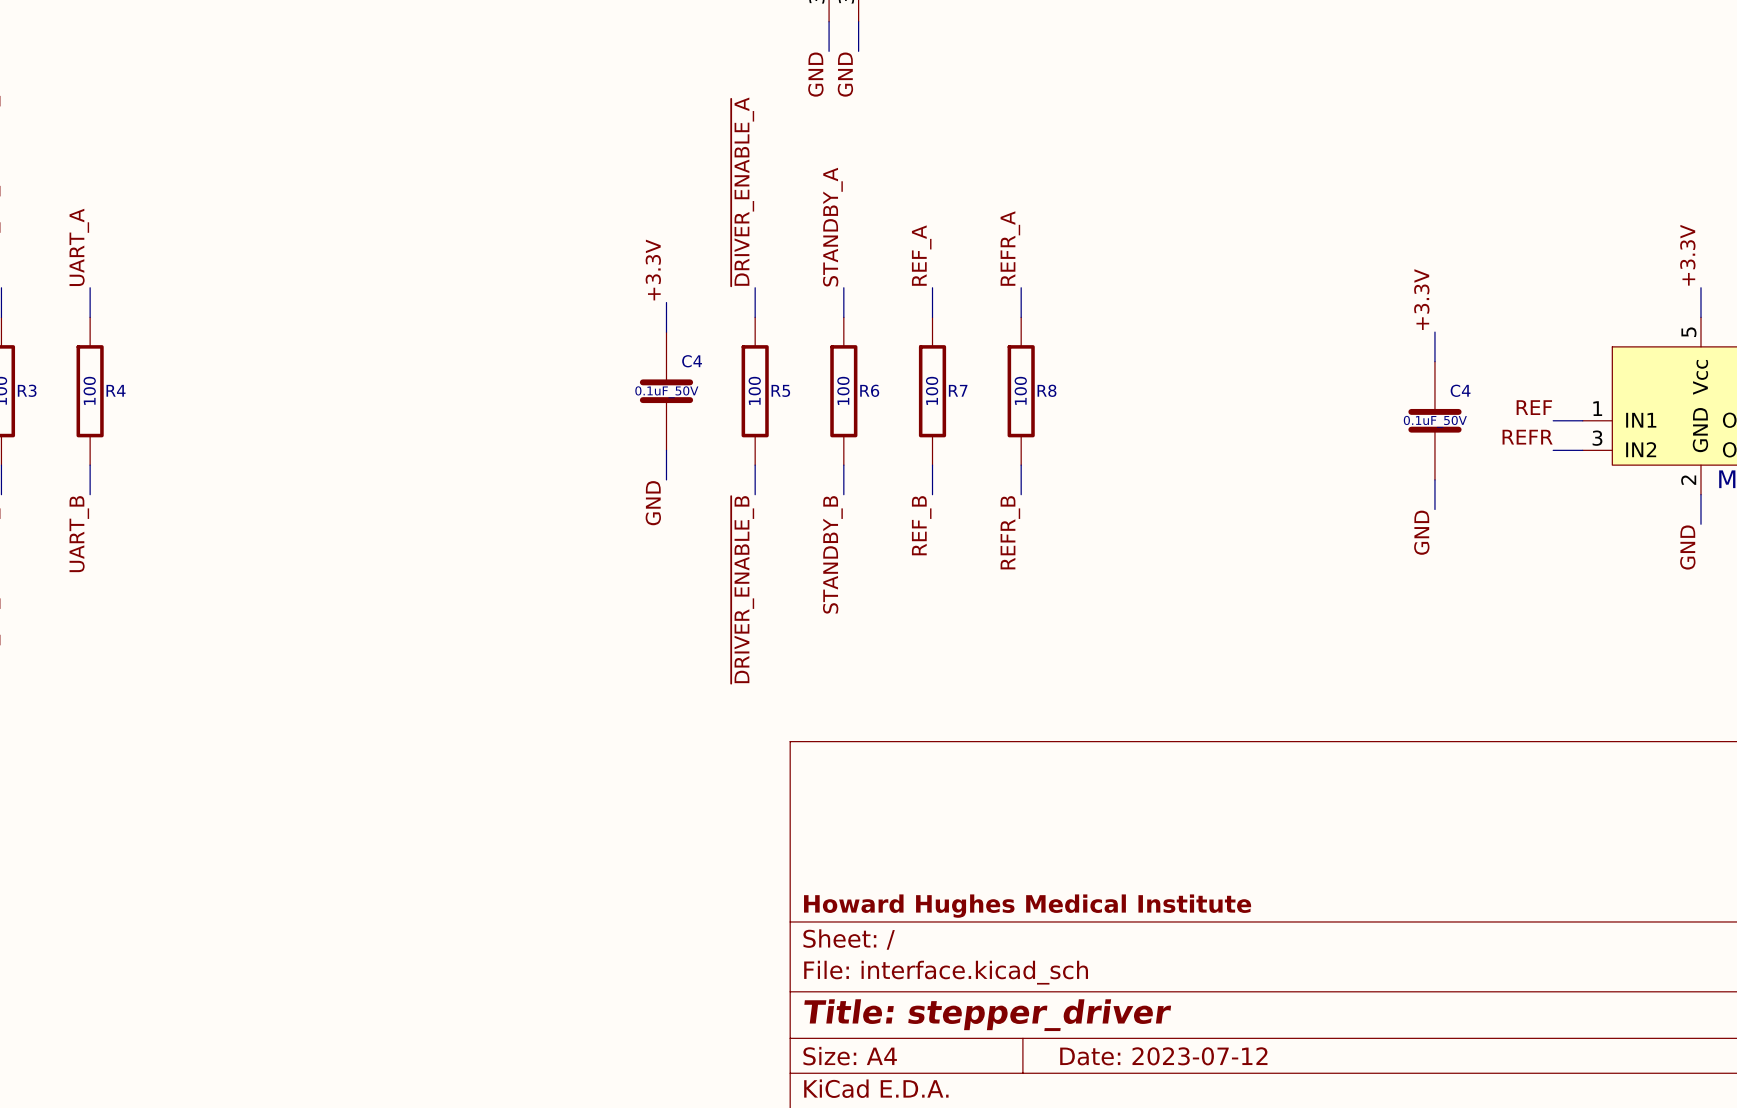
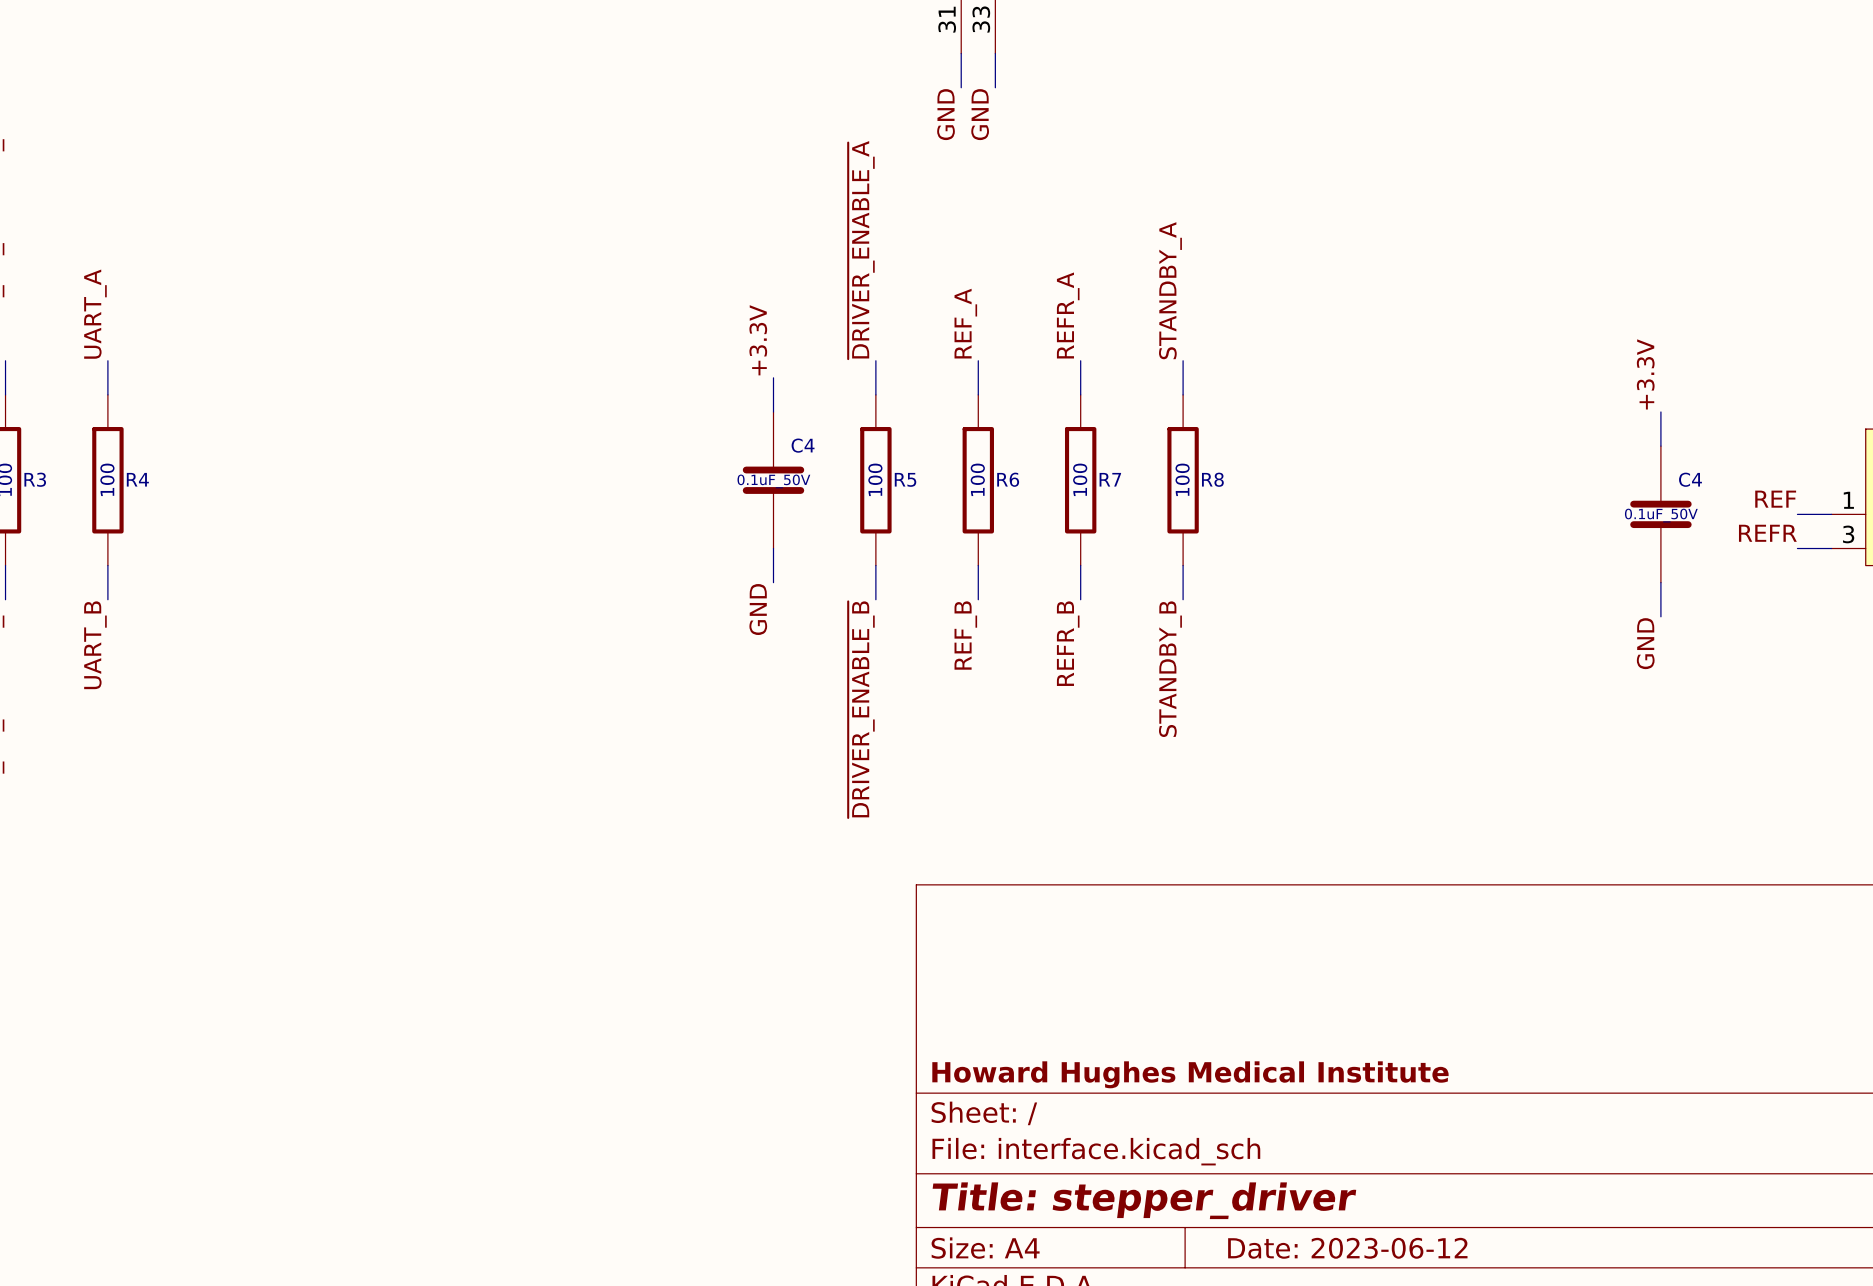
label: STANDBY_A (832, 227) -> REF_A (965, 323)
label: REFR_A (1010, 248) -> STANDBY_A (1170, 290)
label: REF_A (921, 255) -> REFR_A (1068, 315)
label: REF_B (921, 525) -> REFR_B (1068, 643)
label: REFR_B (1010, 532) -> STANDBY_B (1170, 669)
label: STANDBY_B (832, 554) -> REF_B (965, 635)
title block: Date: 2023-07-12 (1163, 1056) -> Date: 2023-06-12 (1347, 1248)

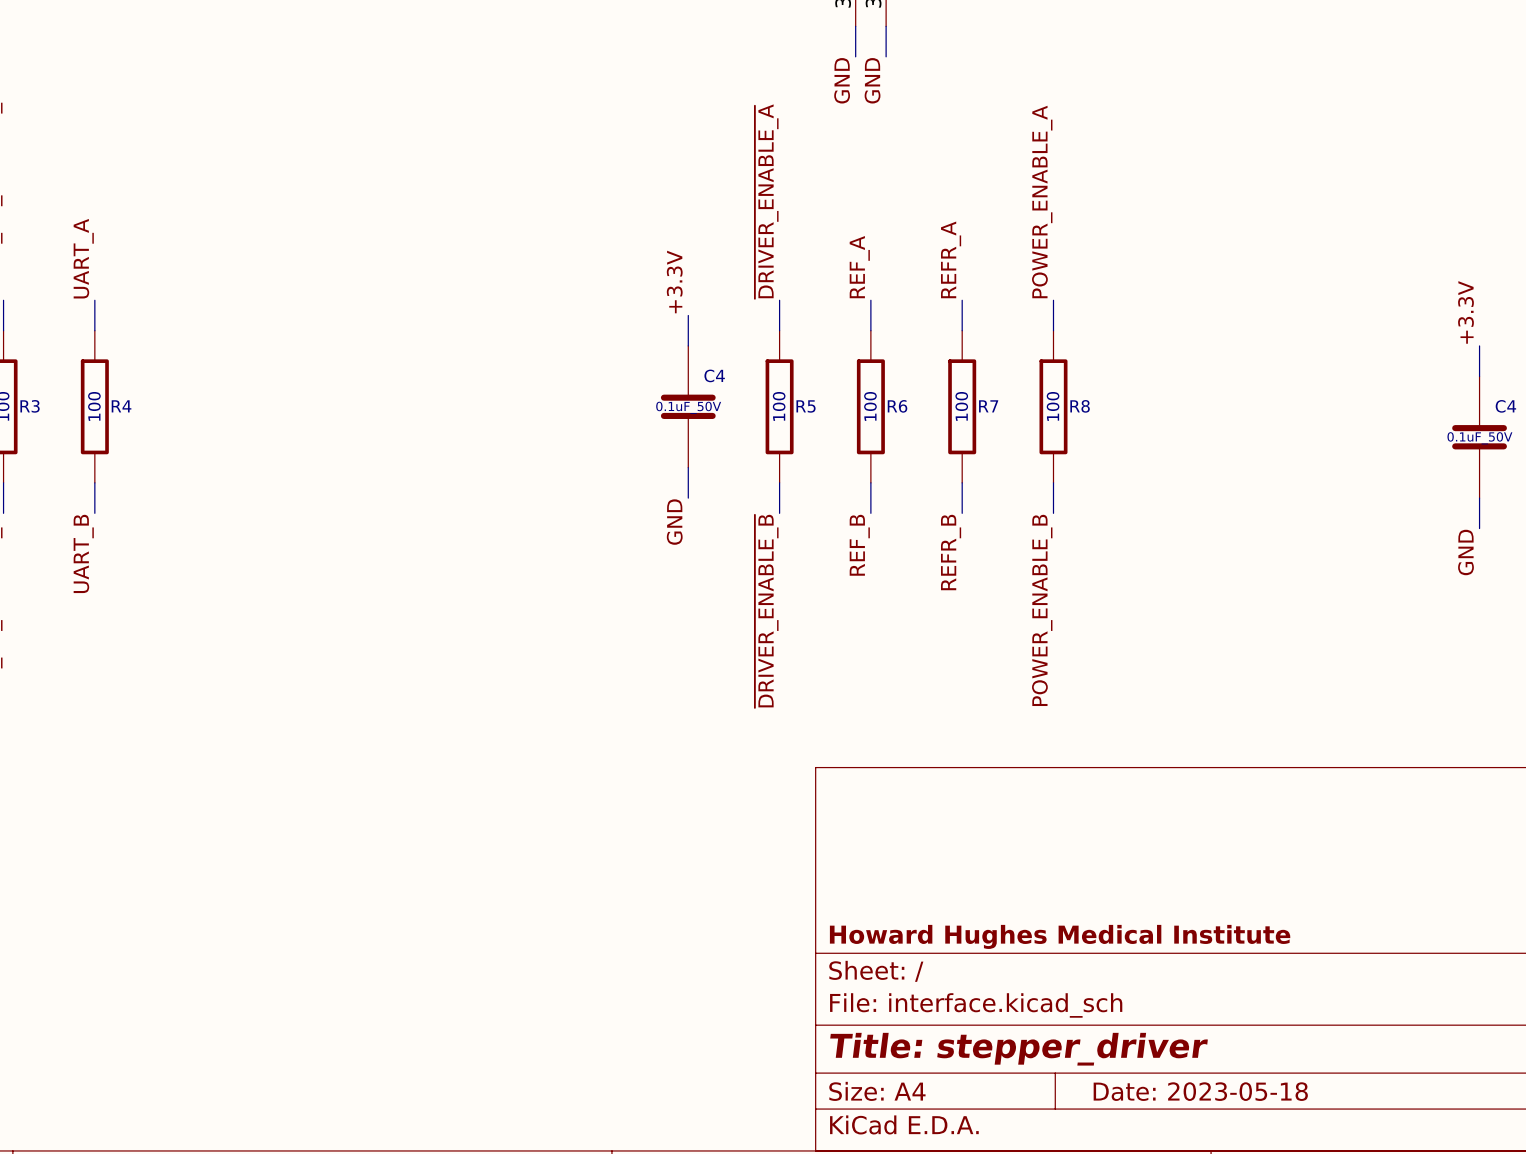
label: STANDBY_A (1170, 290) -> POWER_ENABLE_A (1042, 202)
label: STANDBY_B (1170, 669) -> POWER_ENABLE_B (1042, 610)
title block: Date: 2023-06-12 (1347, 1248) -> Date: 2023-05-18 (1200, 1091)

